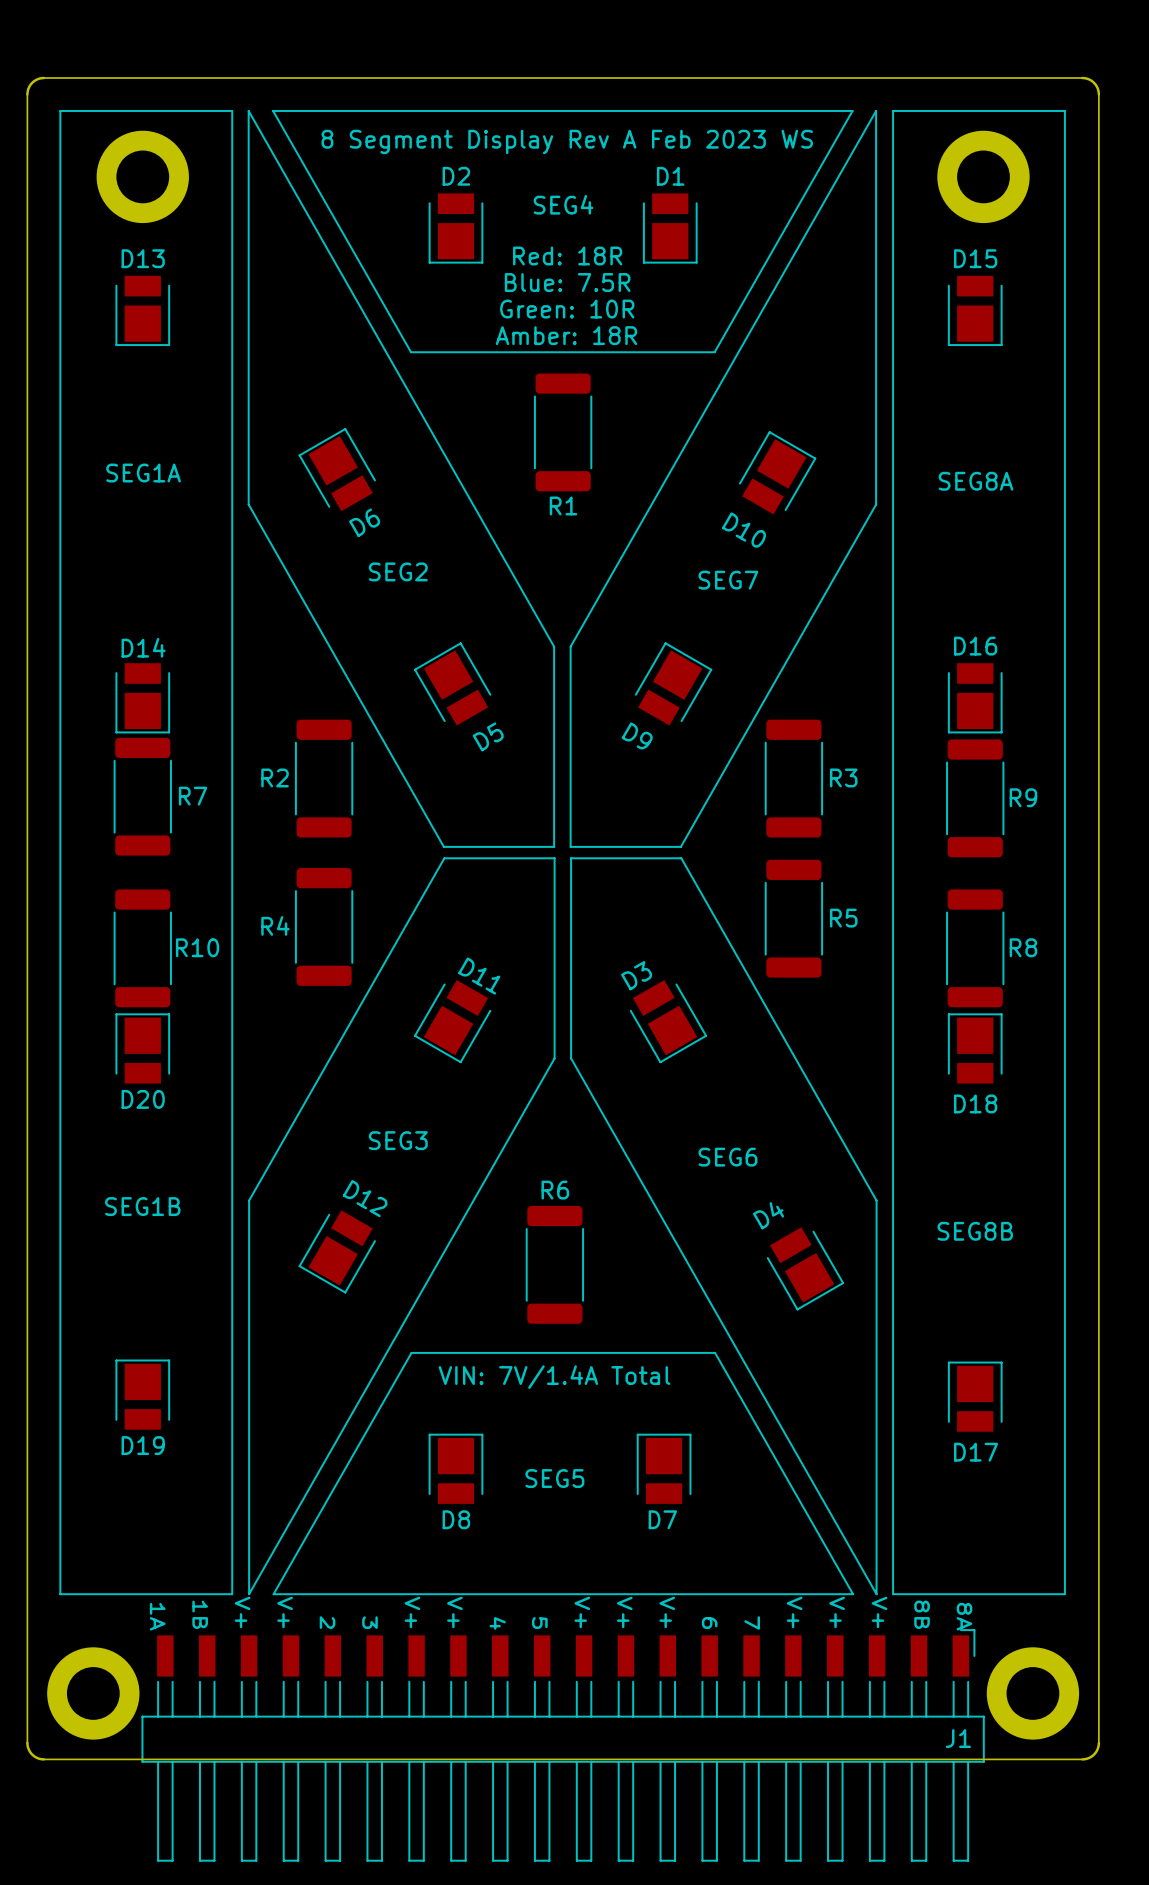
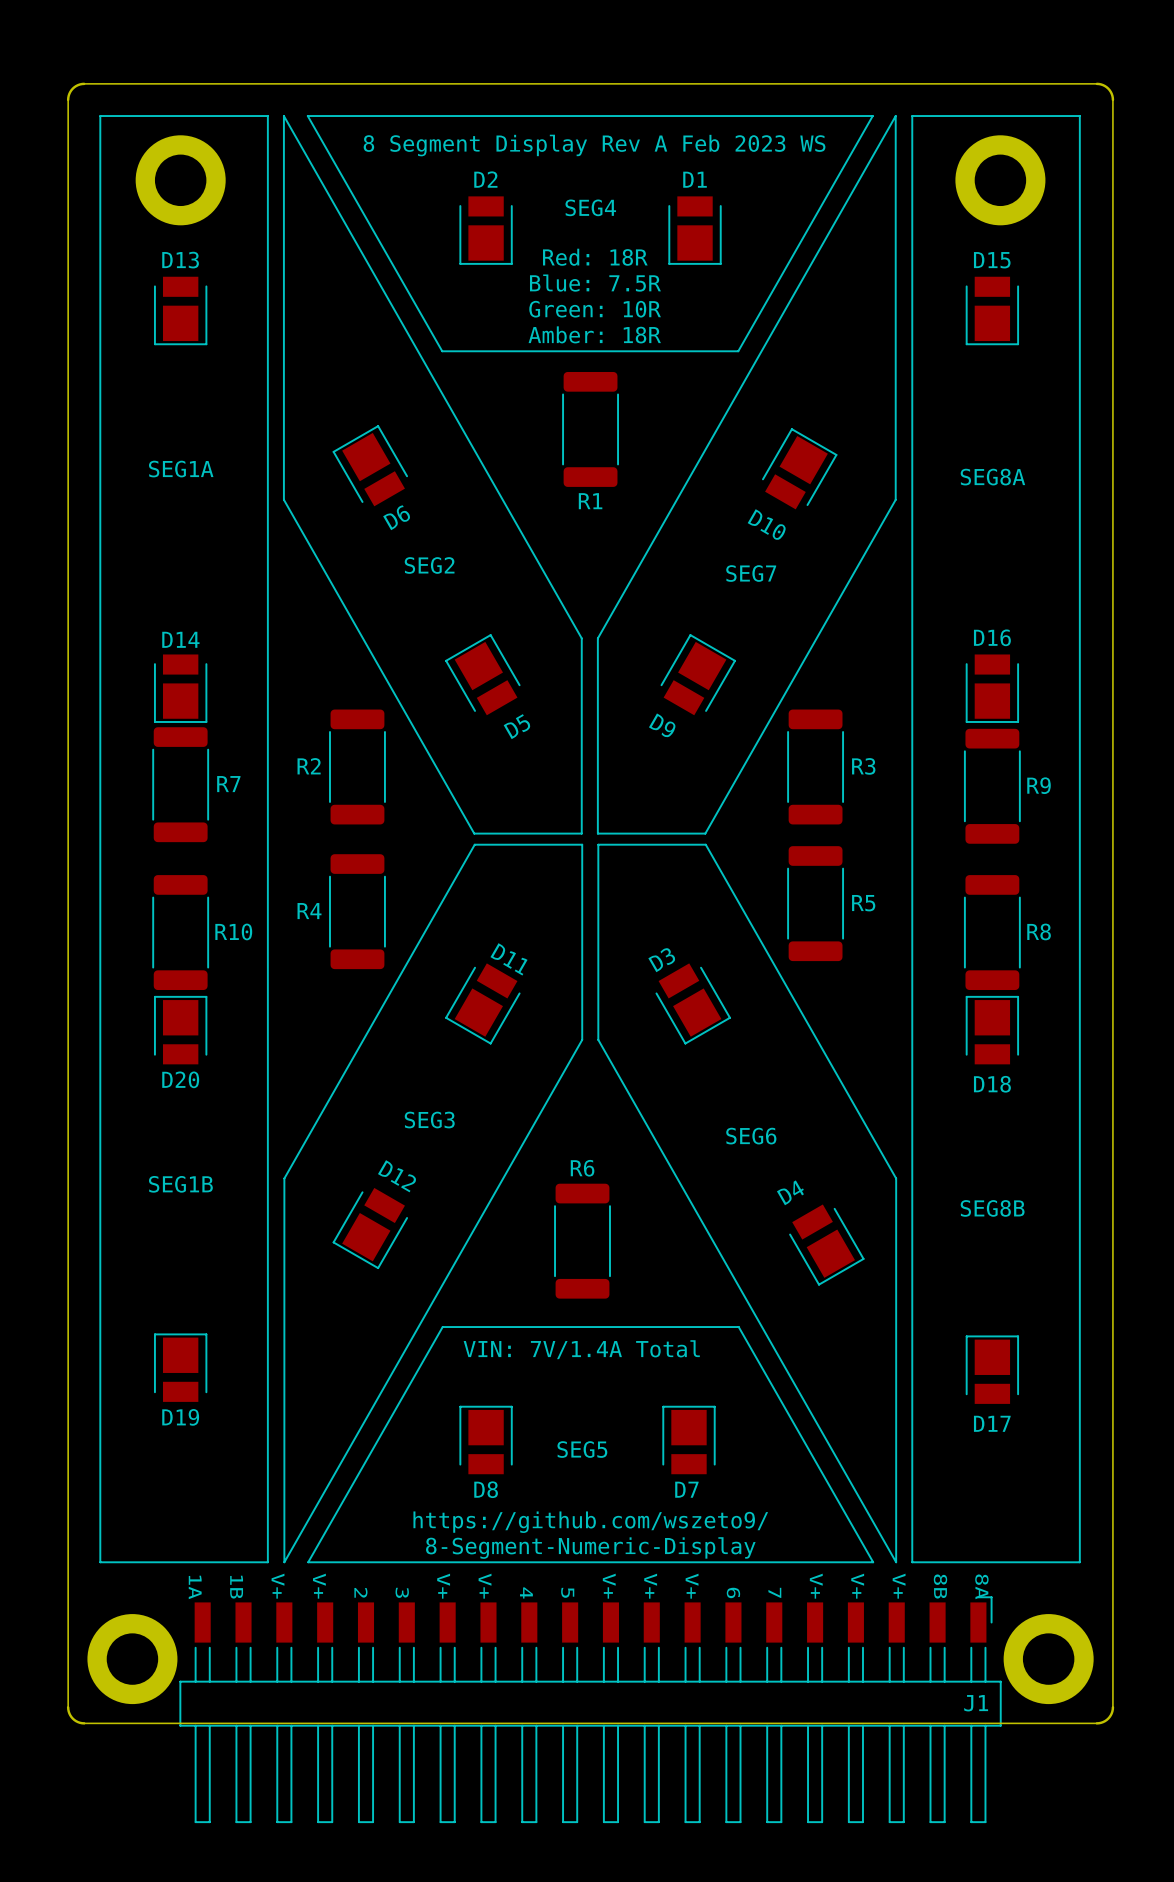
text: none -> https://github.com/wszeto9/ (590, 1522)
text: none -> 8-Segment-Numeric-Display (590, 1548)

